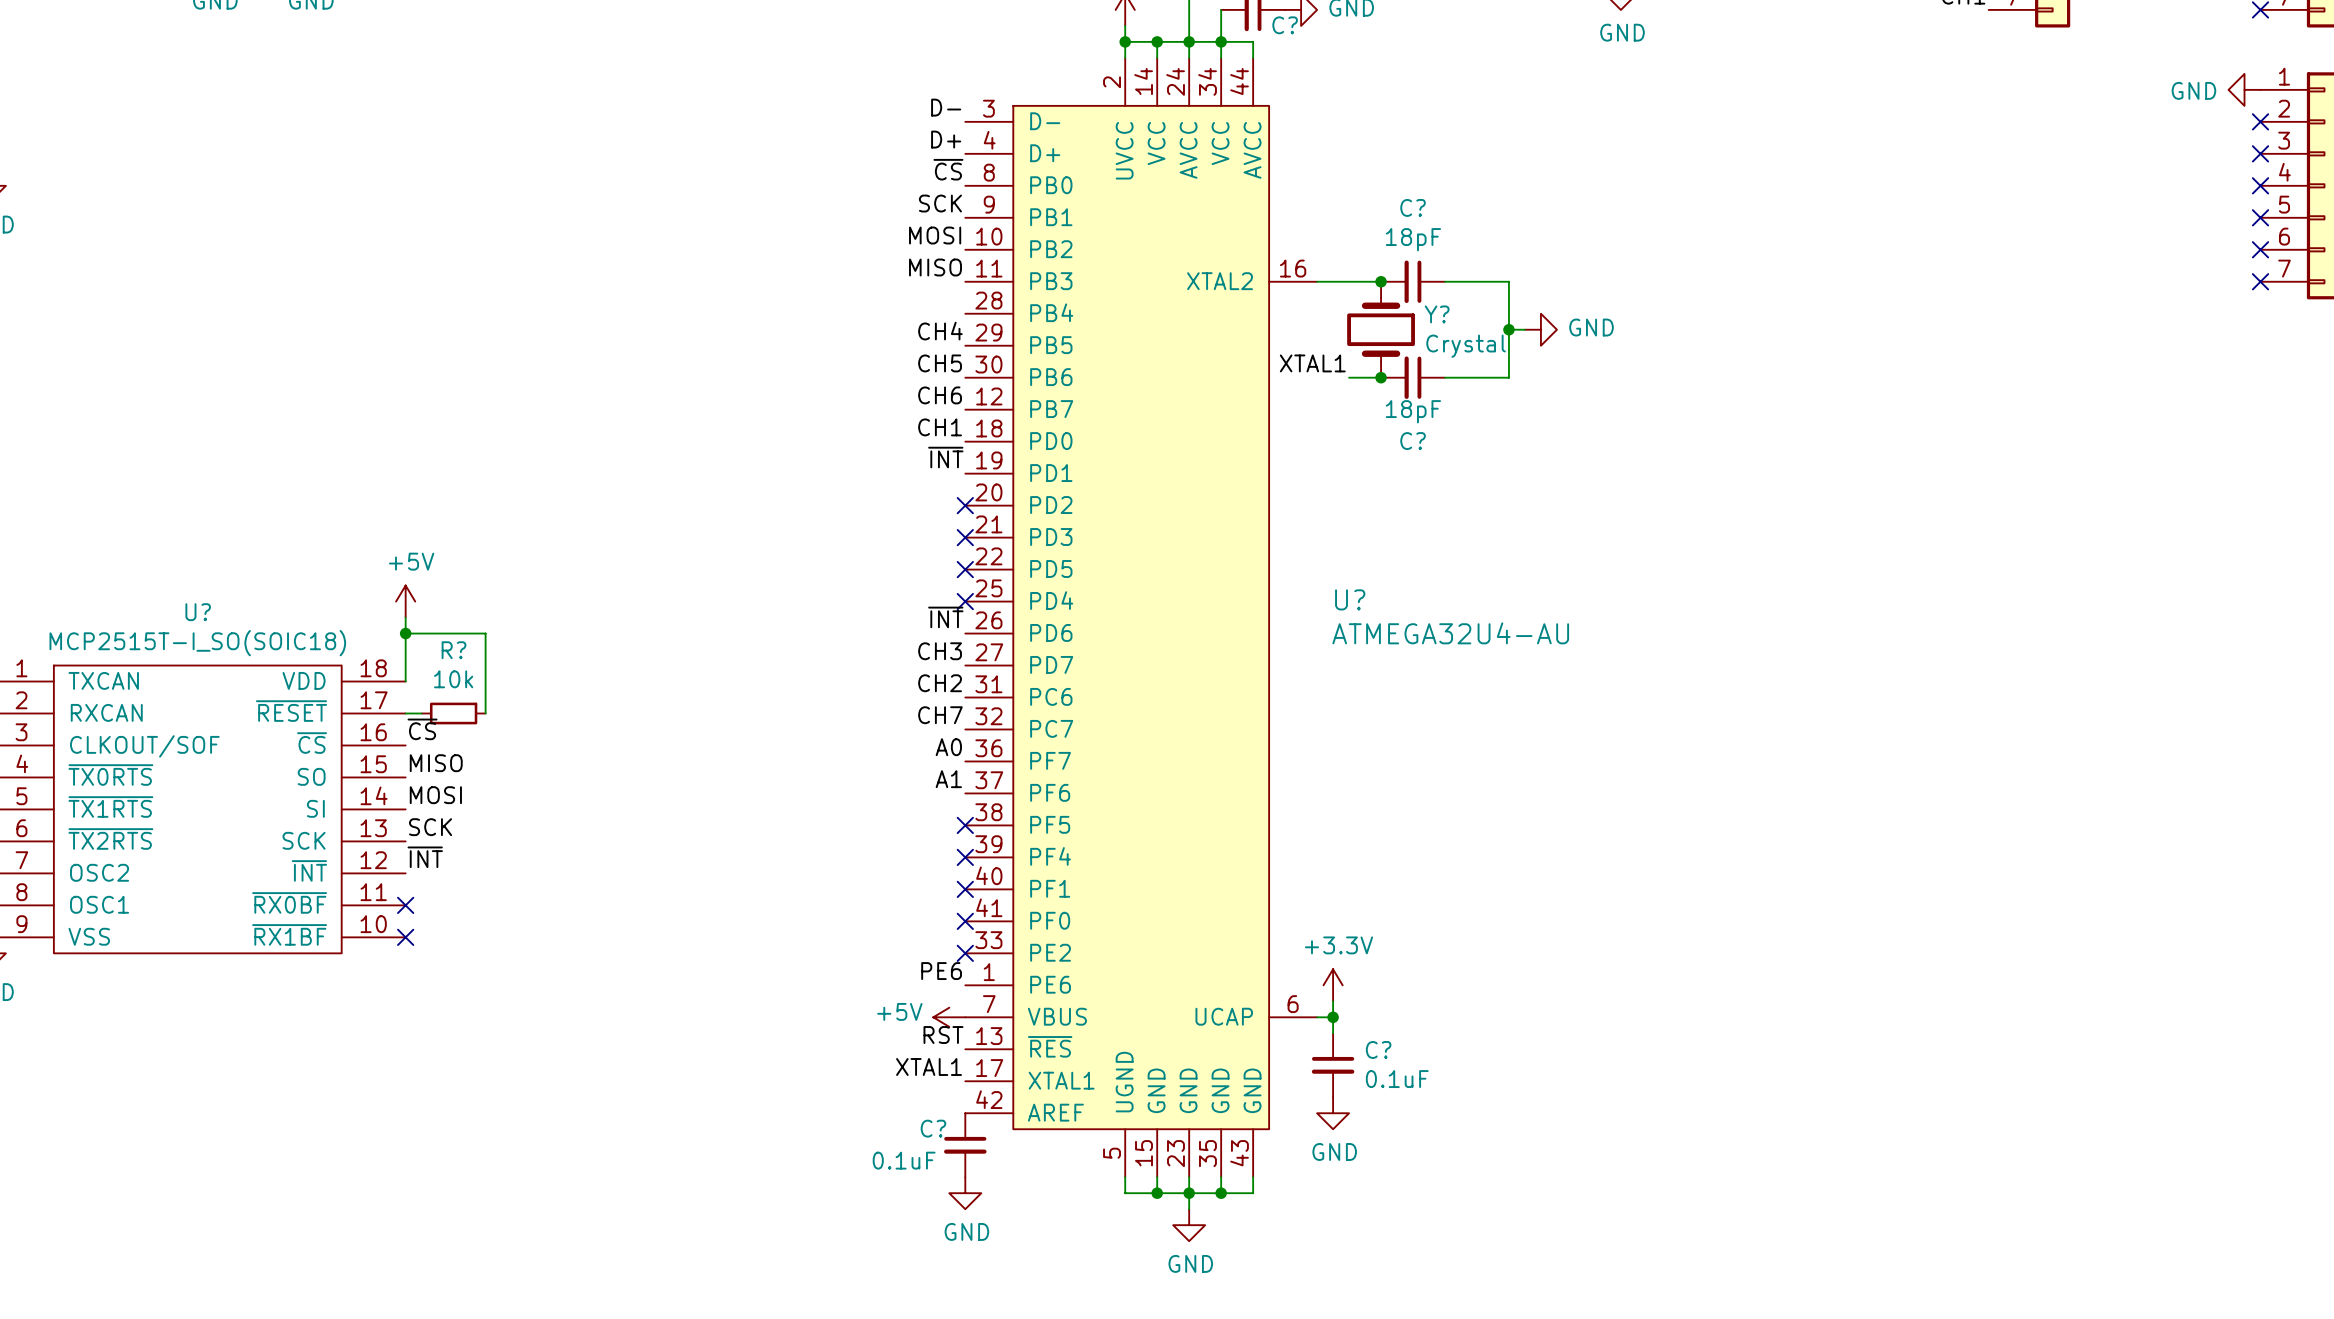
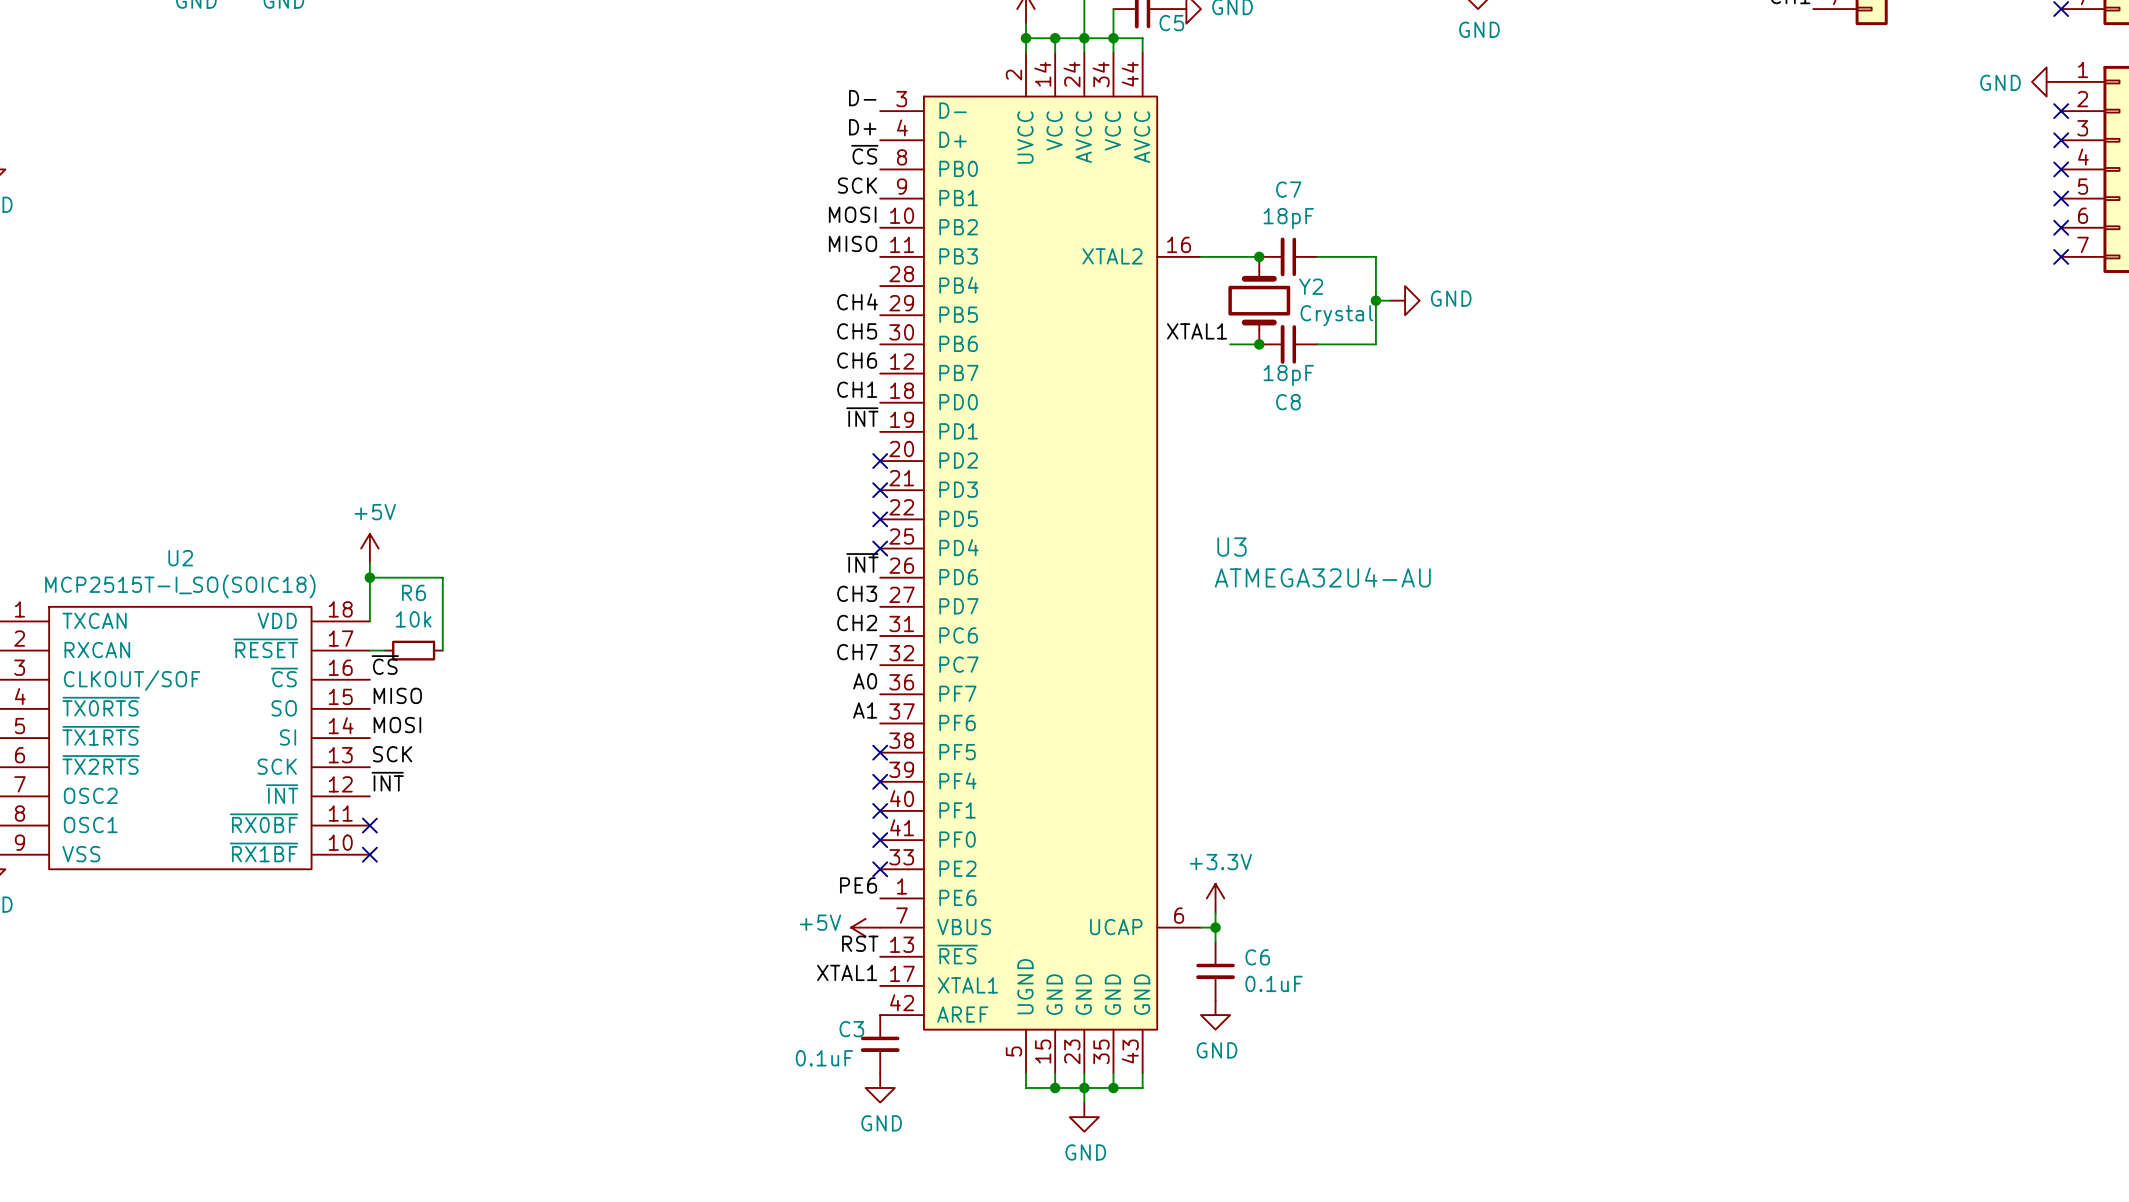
C? name: C? (1285, 25) -> C5 (1171, 23)
C? name: C? (1413, 207) -> C7 (1288, 189)
Y? name: Y? (1437, 314) -> Y2 (1311, 286)
C? name: C? (1413, 441) -> C8 (1288, 402)
U? name: U? (1350, 599) -> U3 (1231, 546)
U? name: U? (198, 612) -> U2 (180, 558)
R? name: R? (454, 650) -> R6 (413, 592)
C? name: C? (1378, 1049) -> C6 (1257, 957)
C? name: C? (933, 1128) -> C3 (851, 1029)

